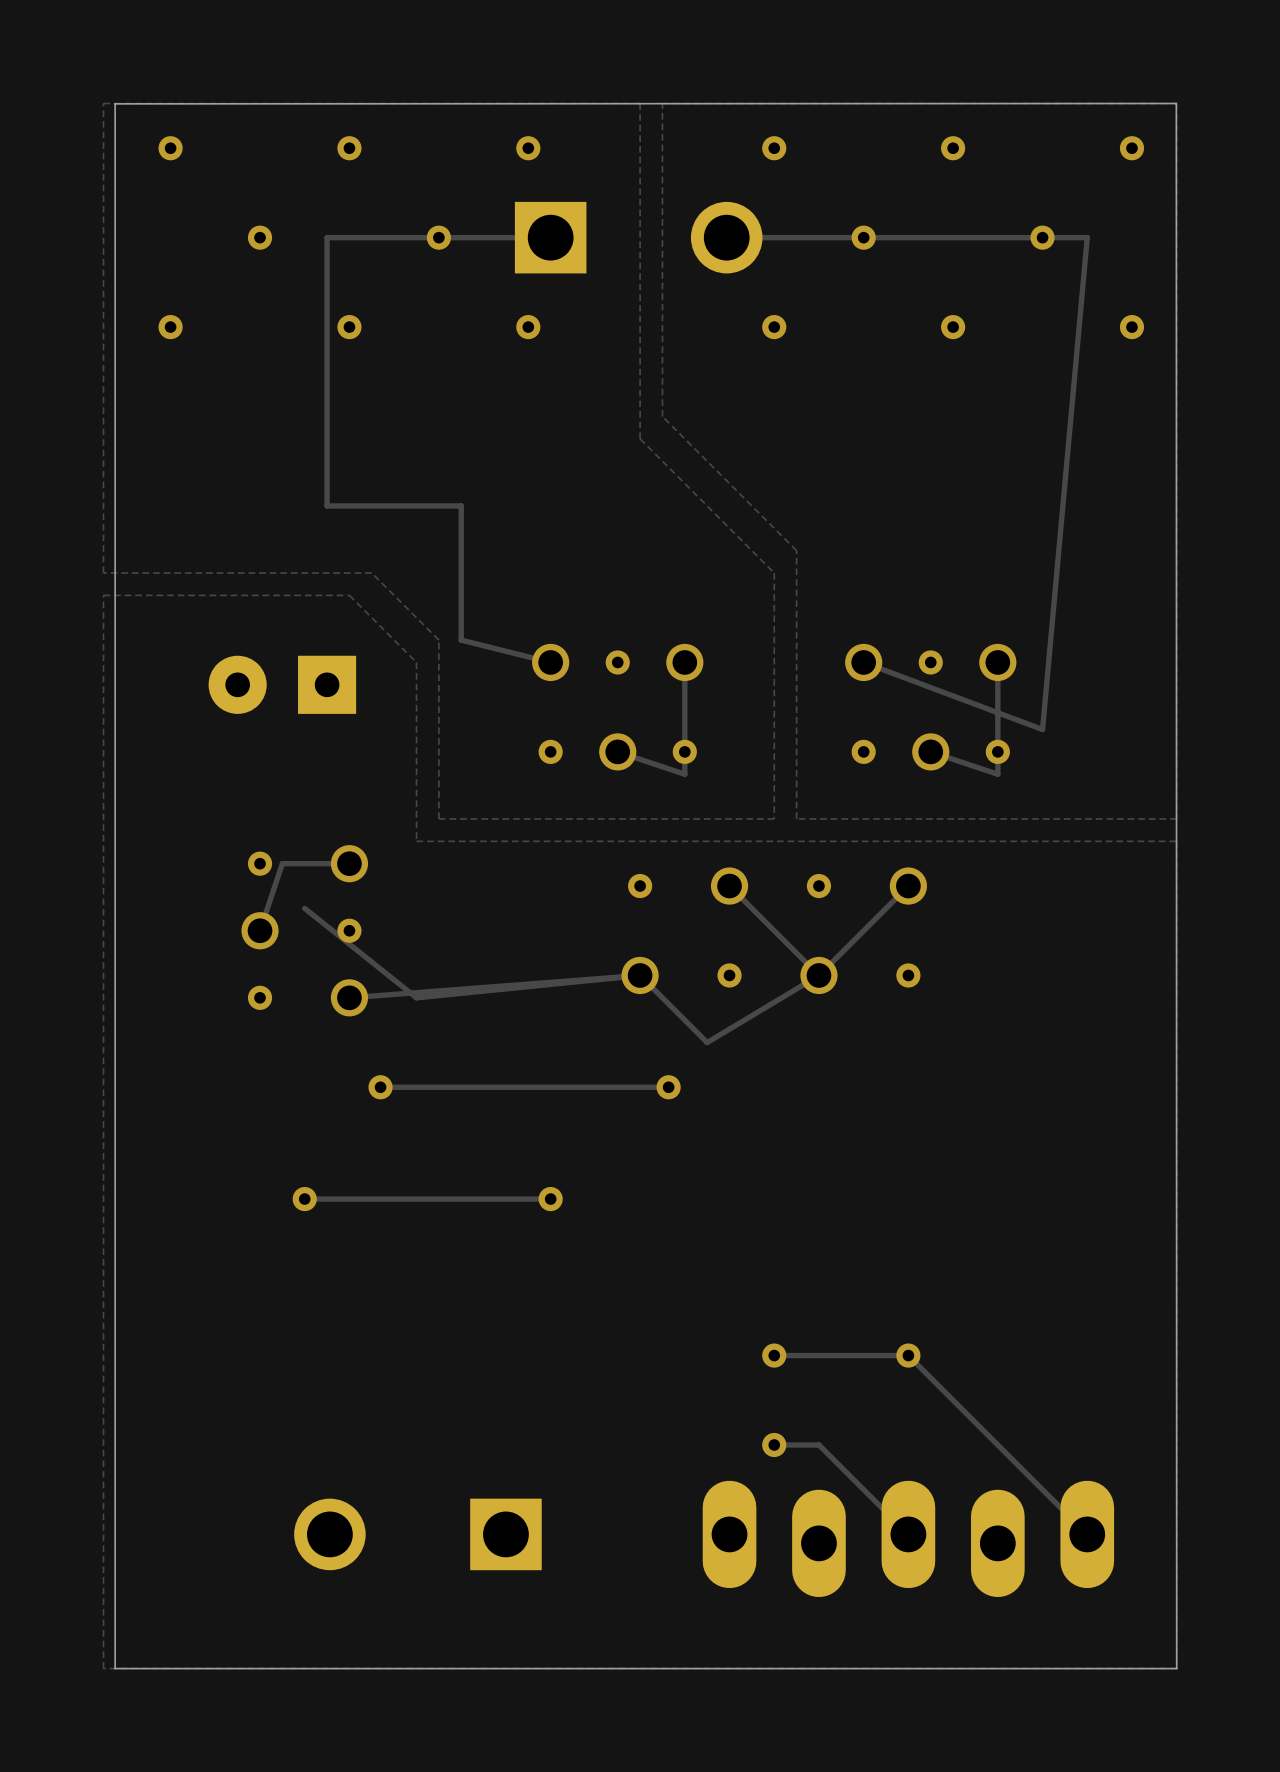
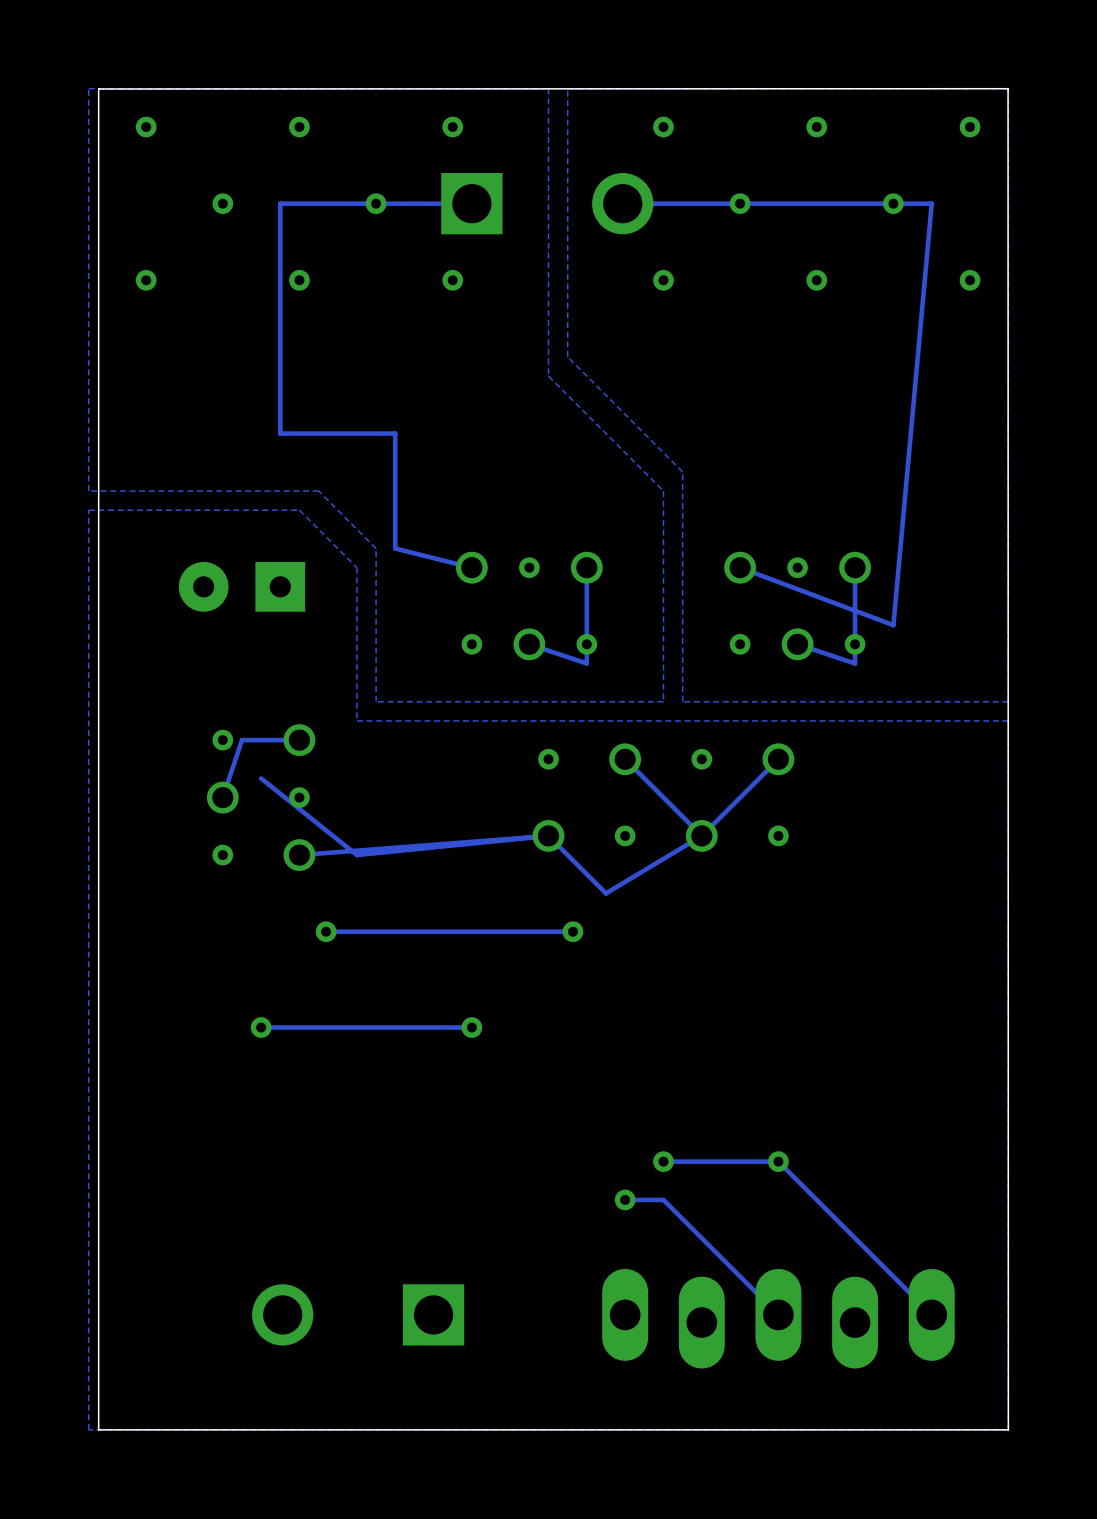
via position: (774, 1444) -> (625, 1199)
track: (818, 1444) (774, 1444) -> (701, 1238) (663, 1199) (625, 1199)

